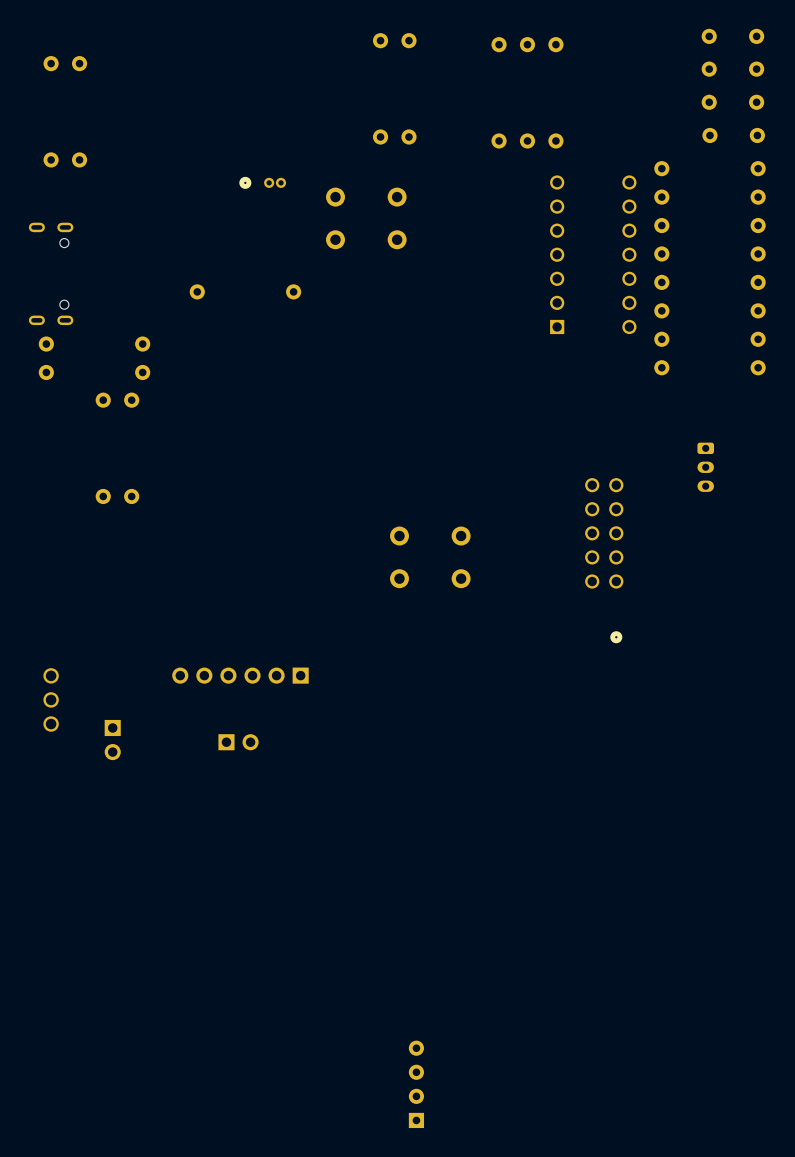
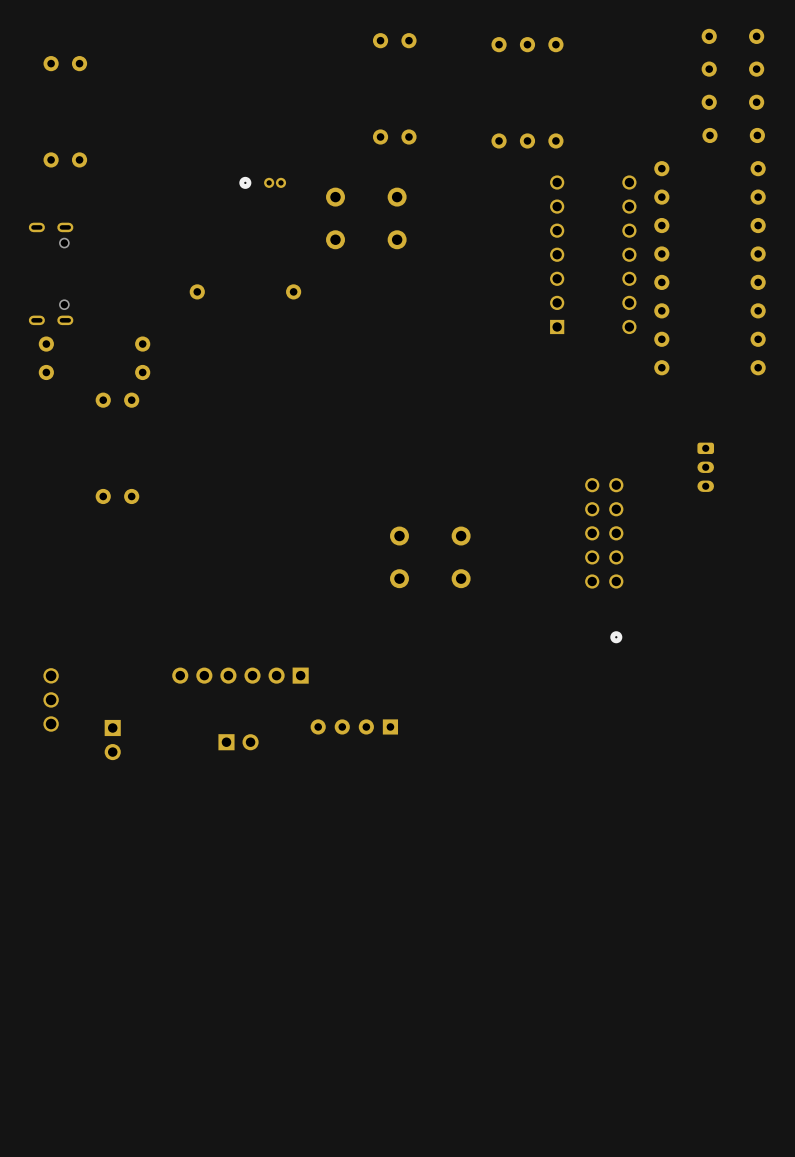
part: none -> (354, 726)
part: (416, 1084) -> none

